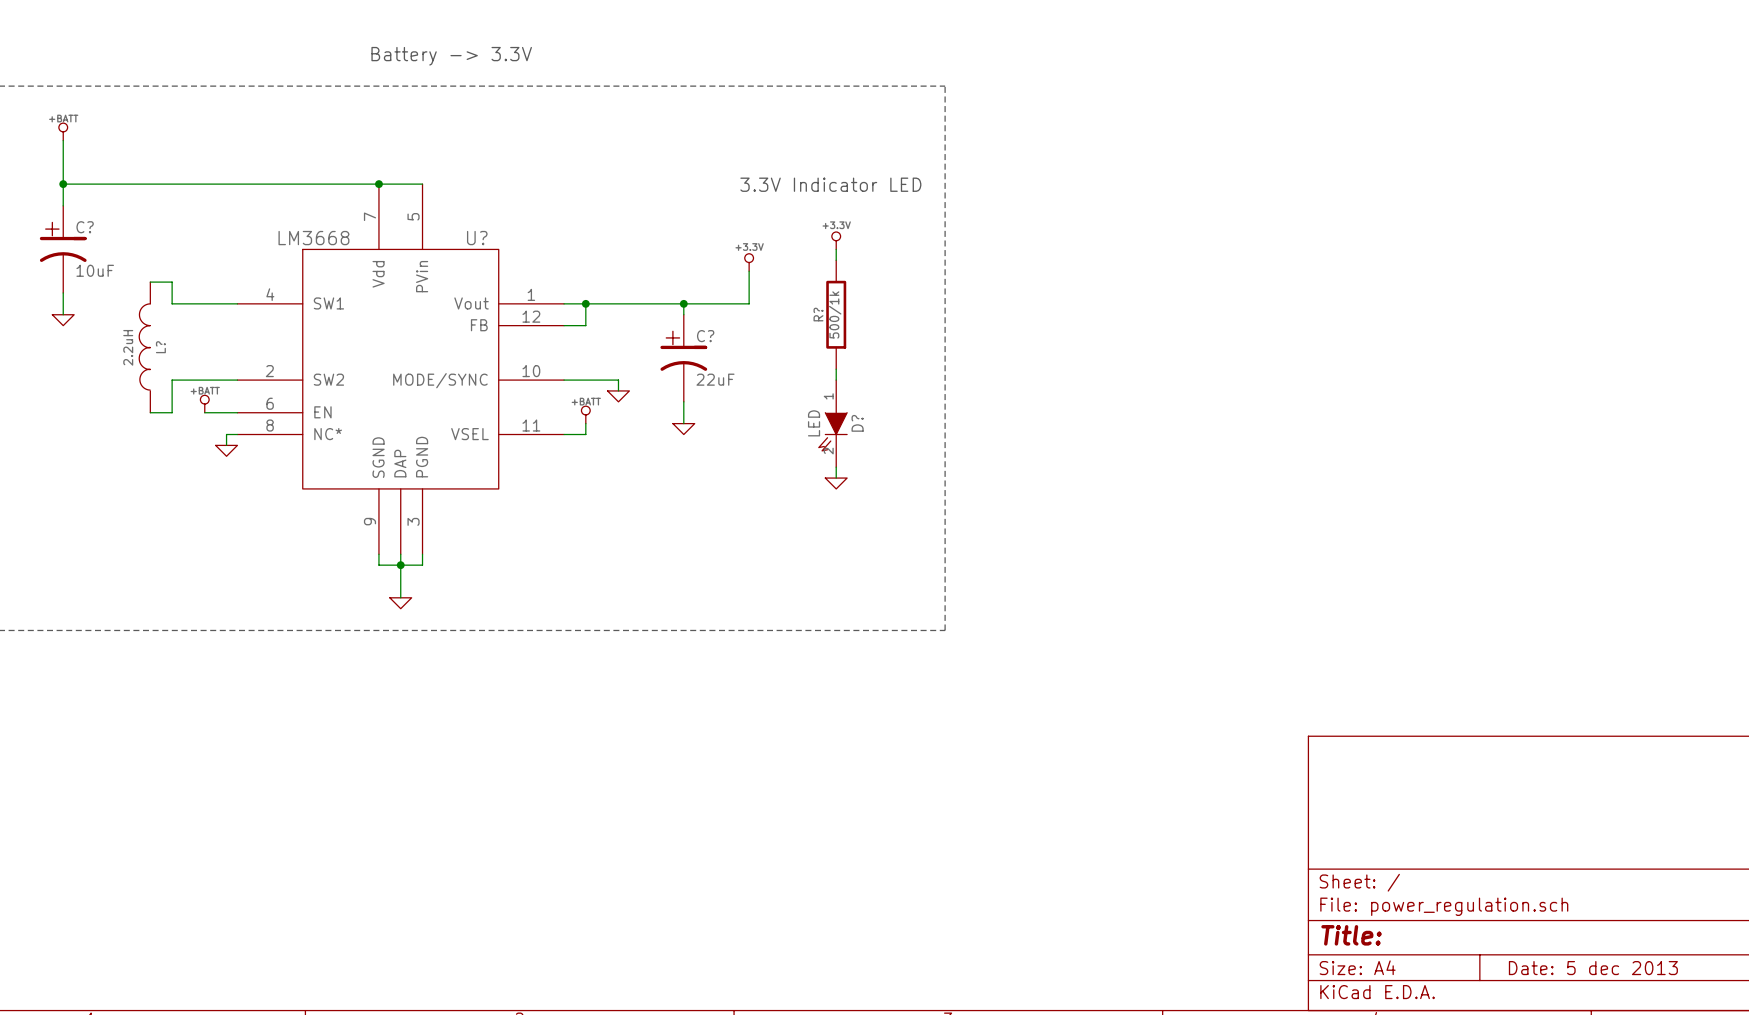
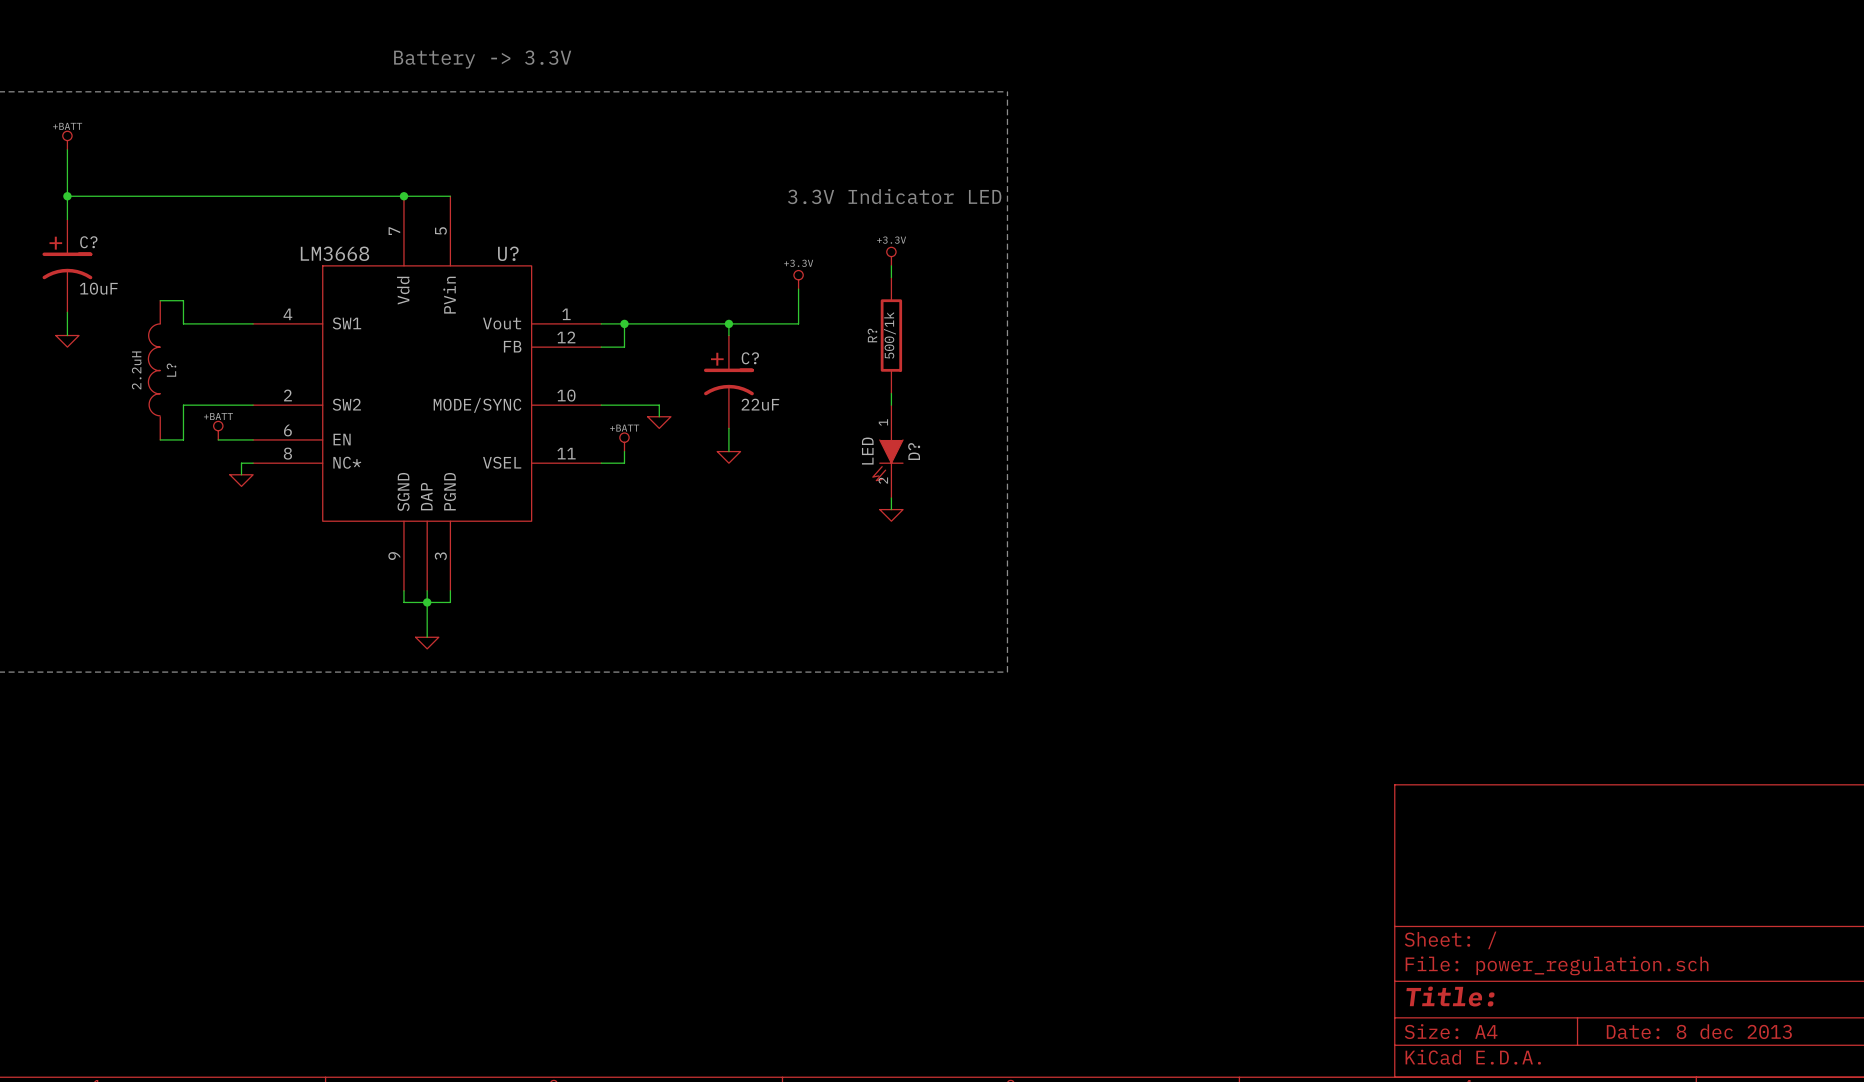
title block: Date: 5 dec 2013 (1593, 968) -> Date: 8 dec 2013 (1699, 1031)

